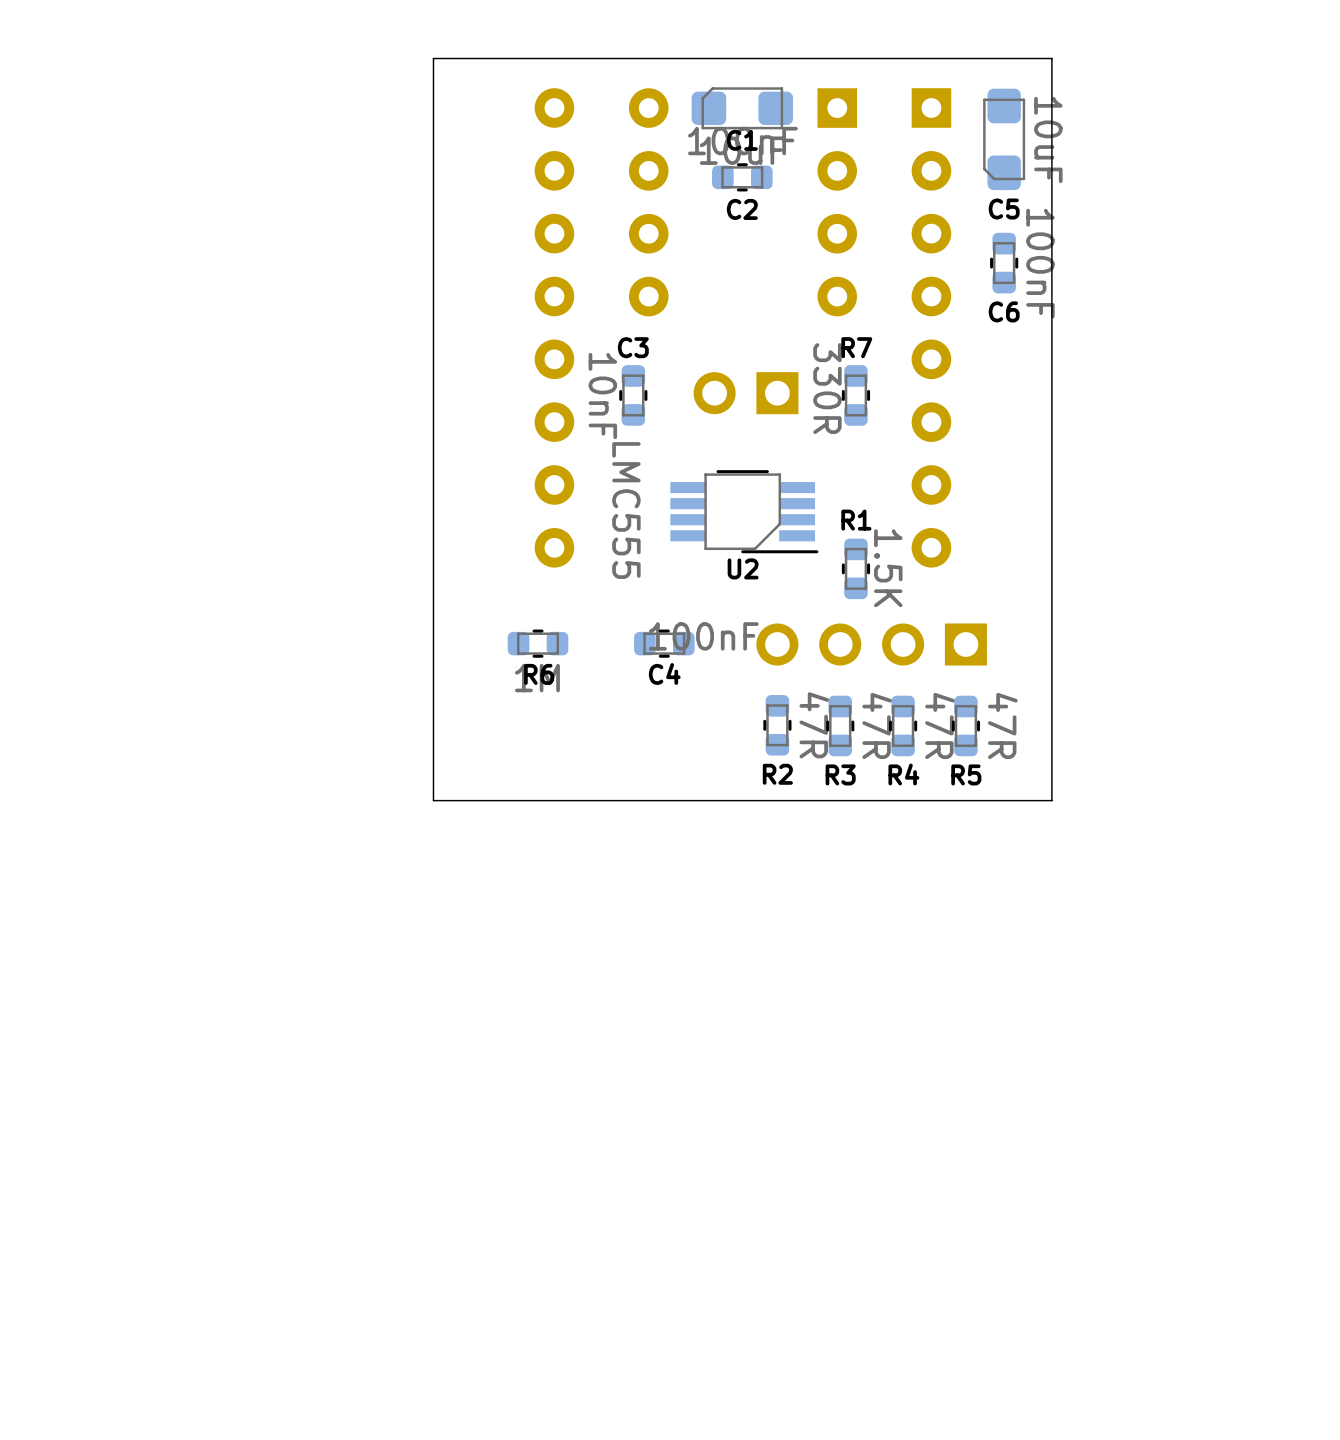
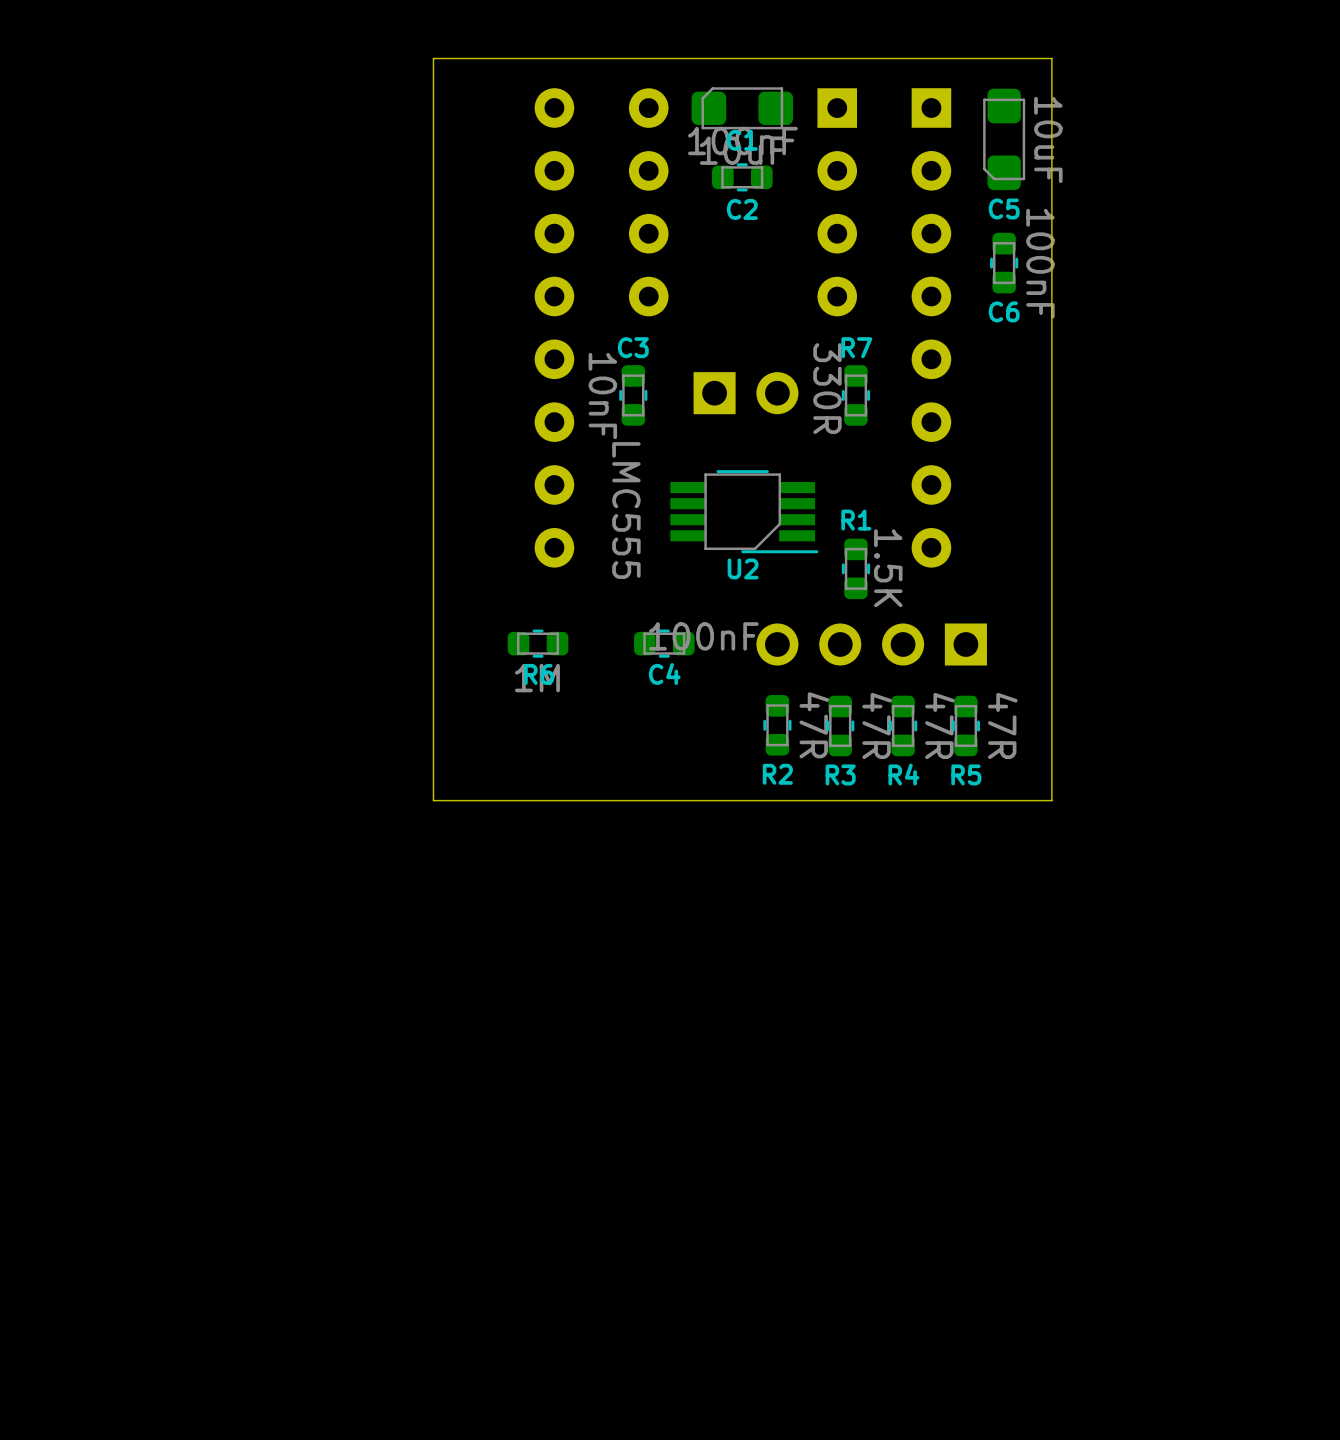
part rotation: 0° (746, 393) -> 180° (746, 393)

